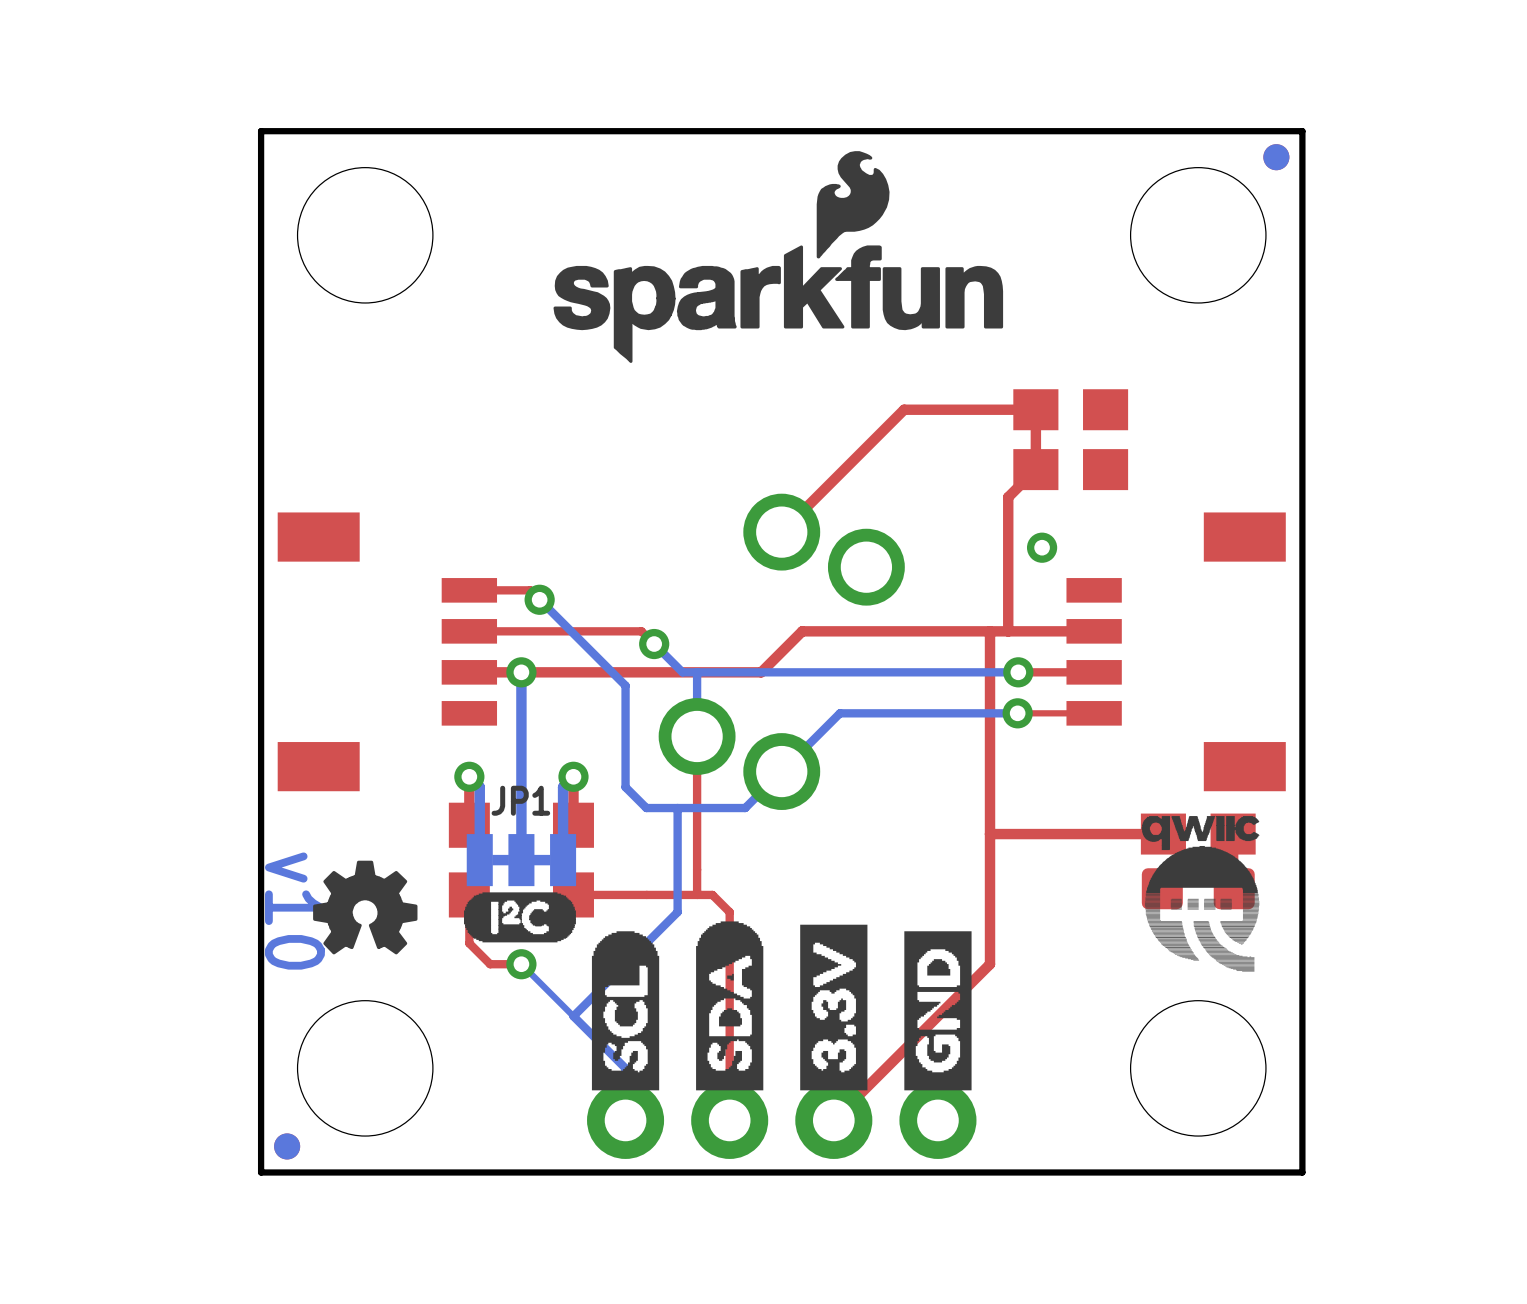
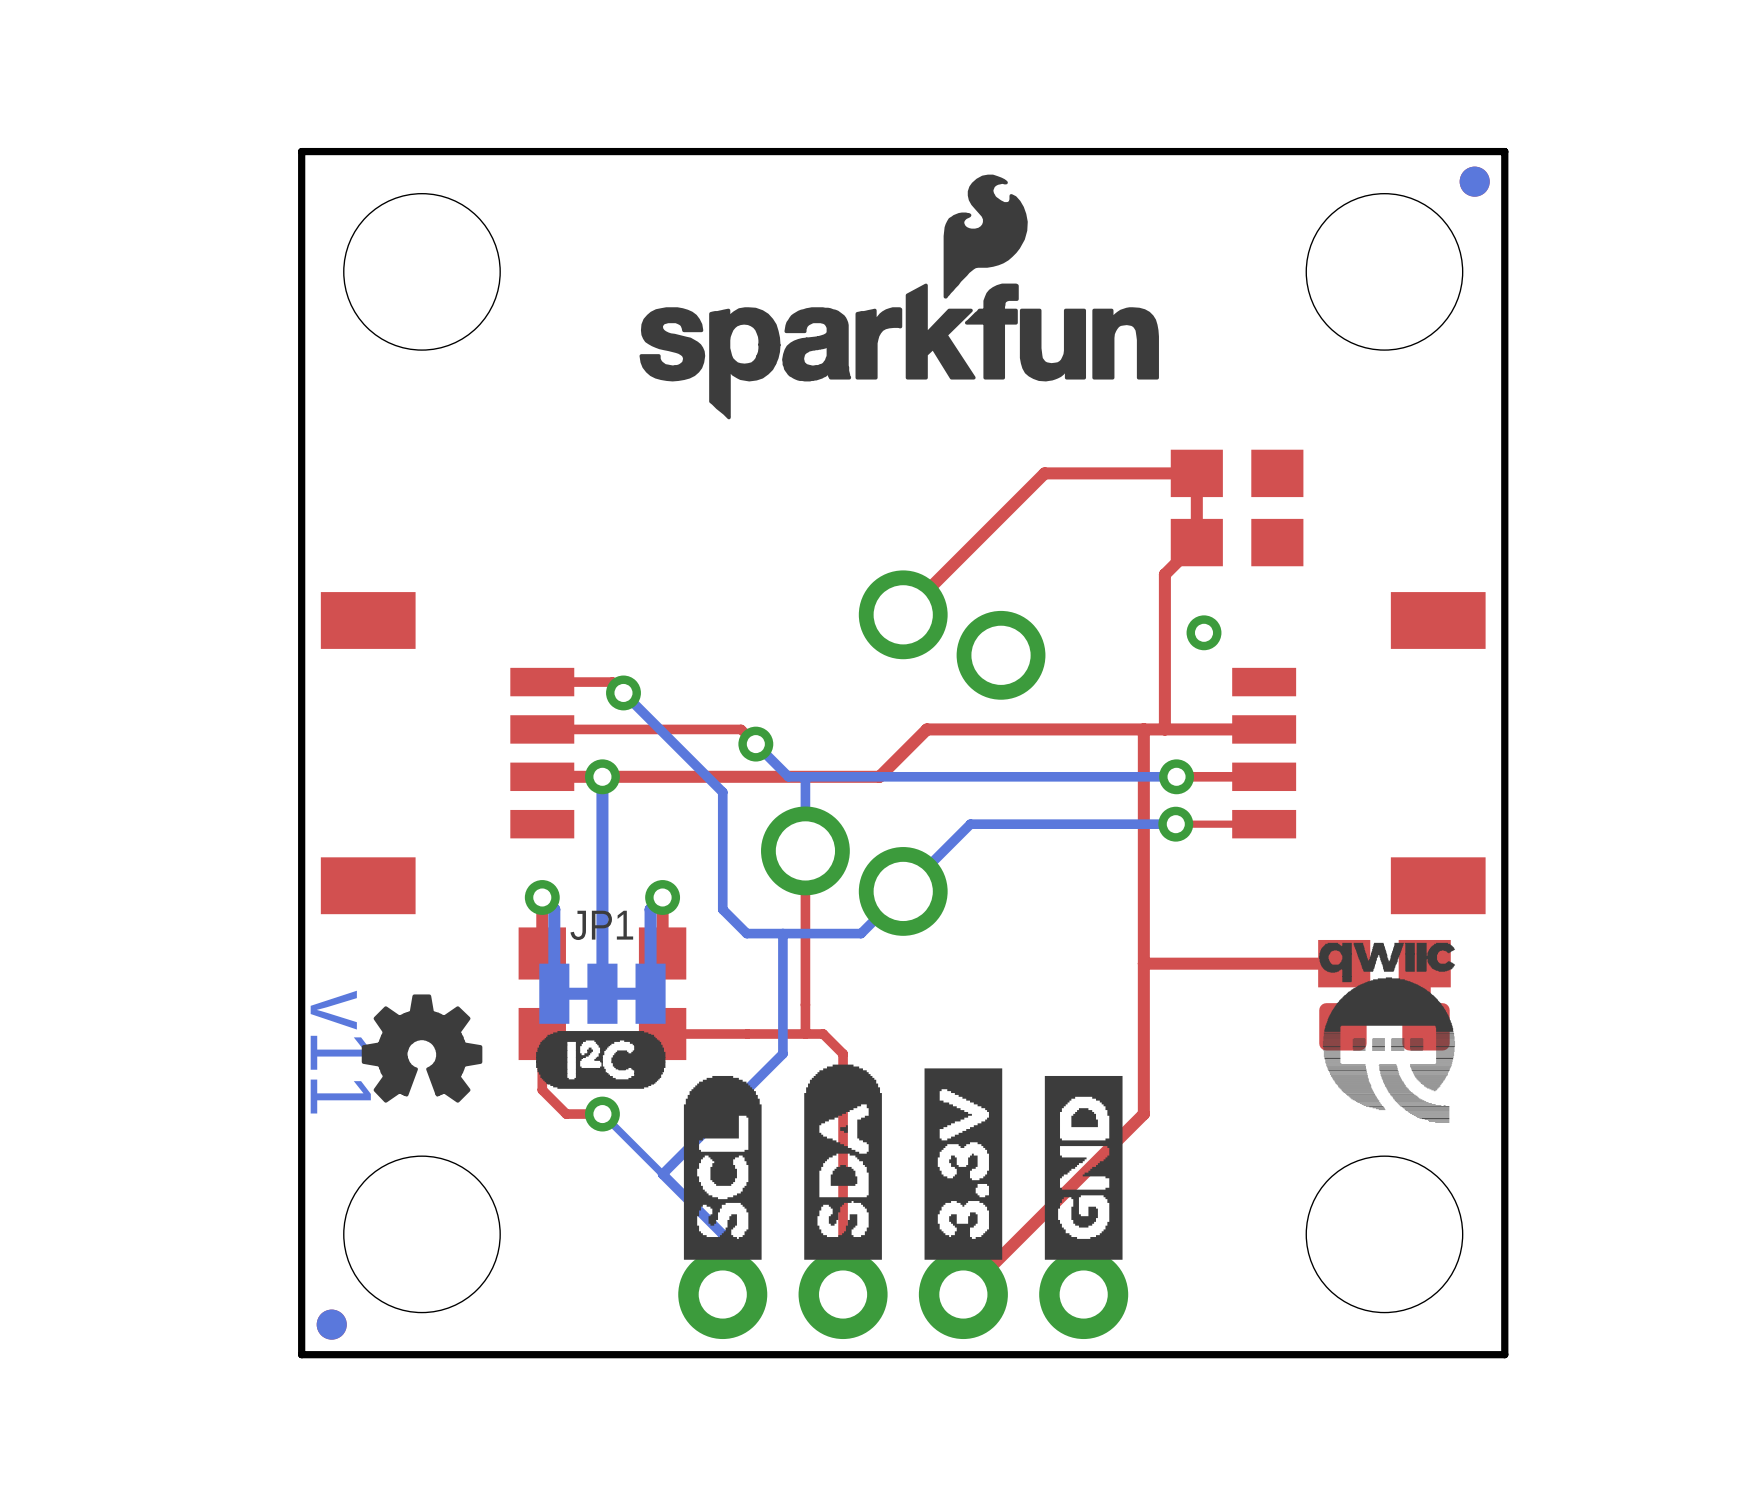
text: v10 (294, 911) -> v11 (340, 1052)

